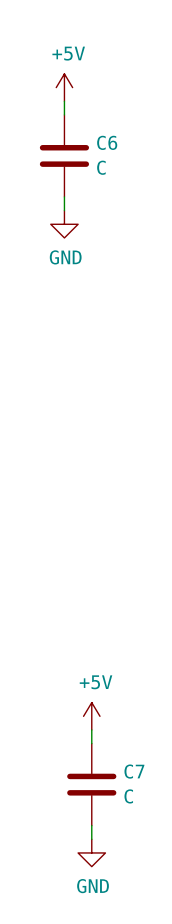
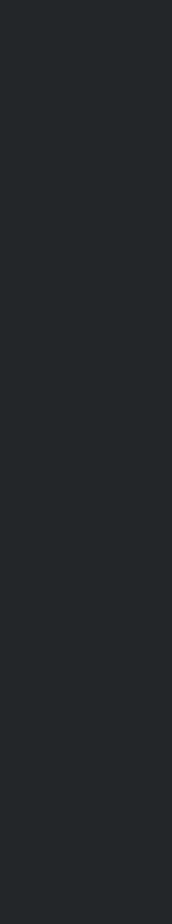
power symbol: +5V (64, 87) -> none
wire: (64, 101) (64, 114) -> none
C6: C (64, 155) -> none
wire: (64, 196) (64, 210) -> none
power symbol: GND (64, 224) -> none
power symbol: +5V (91, 716) -> none
wire: (91, 729) (91, 743) -> none
C7: C (91, 784) -> none
wire: (91, 825) (91, 839) -> none
power symbol: GND (91, 852) -> none

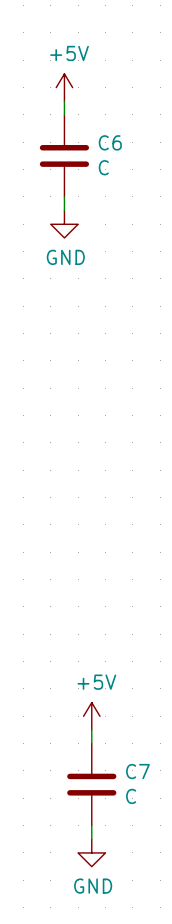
power symbol: none -> +5V (64, 87)
wire: none -> (64, 101) (64, 114)
C6: none -> C (64, 155)
wire: none -> (64, 196) (64, 210)
power symbol: none -> GND (64, 224)
power symbol: none -> +5V (91, 716)
wire: none -> (91, 729) (91, 743)
C7: none -> C (91, 784)
wire: none -> (91, 825) (91, 839)
power symbol: none -> GND (91, 852)

